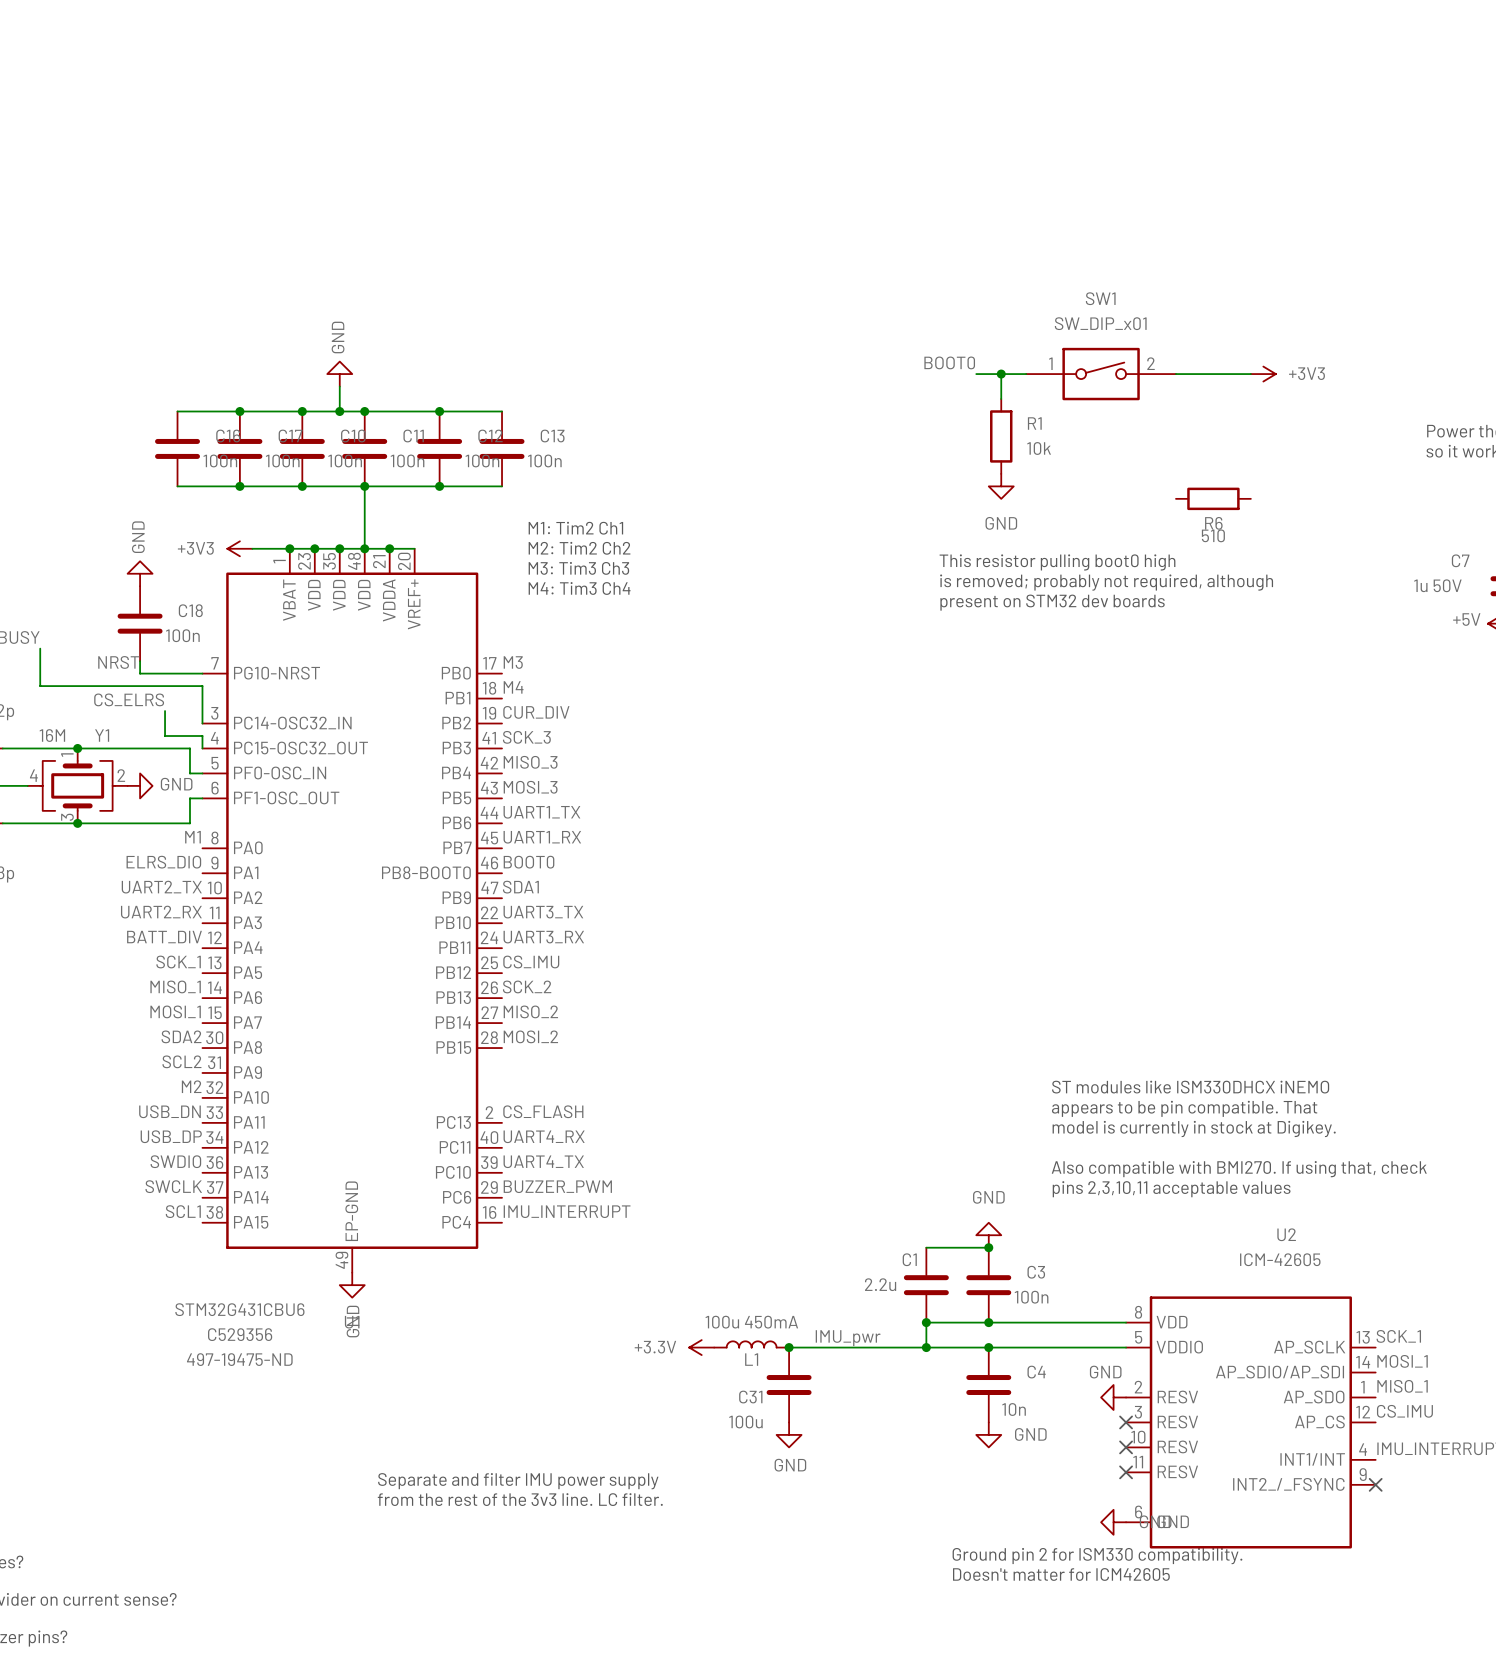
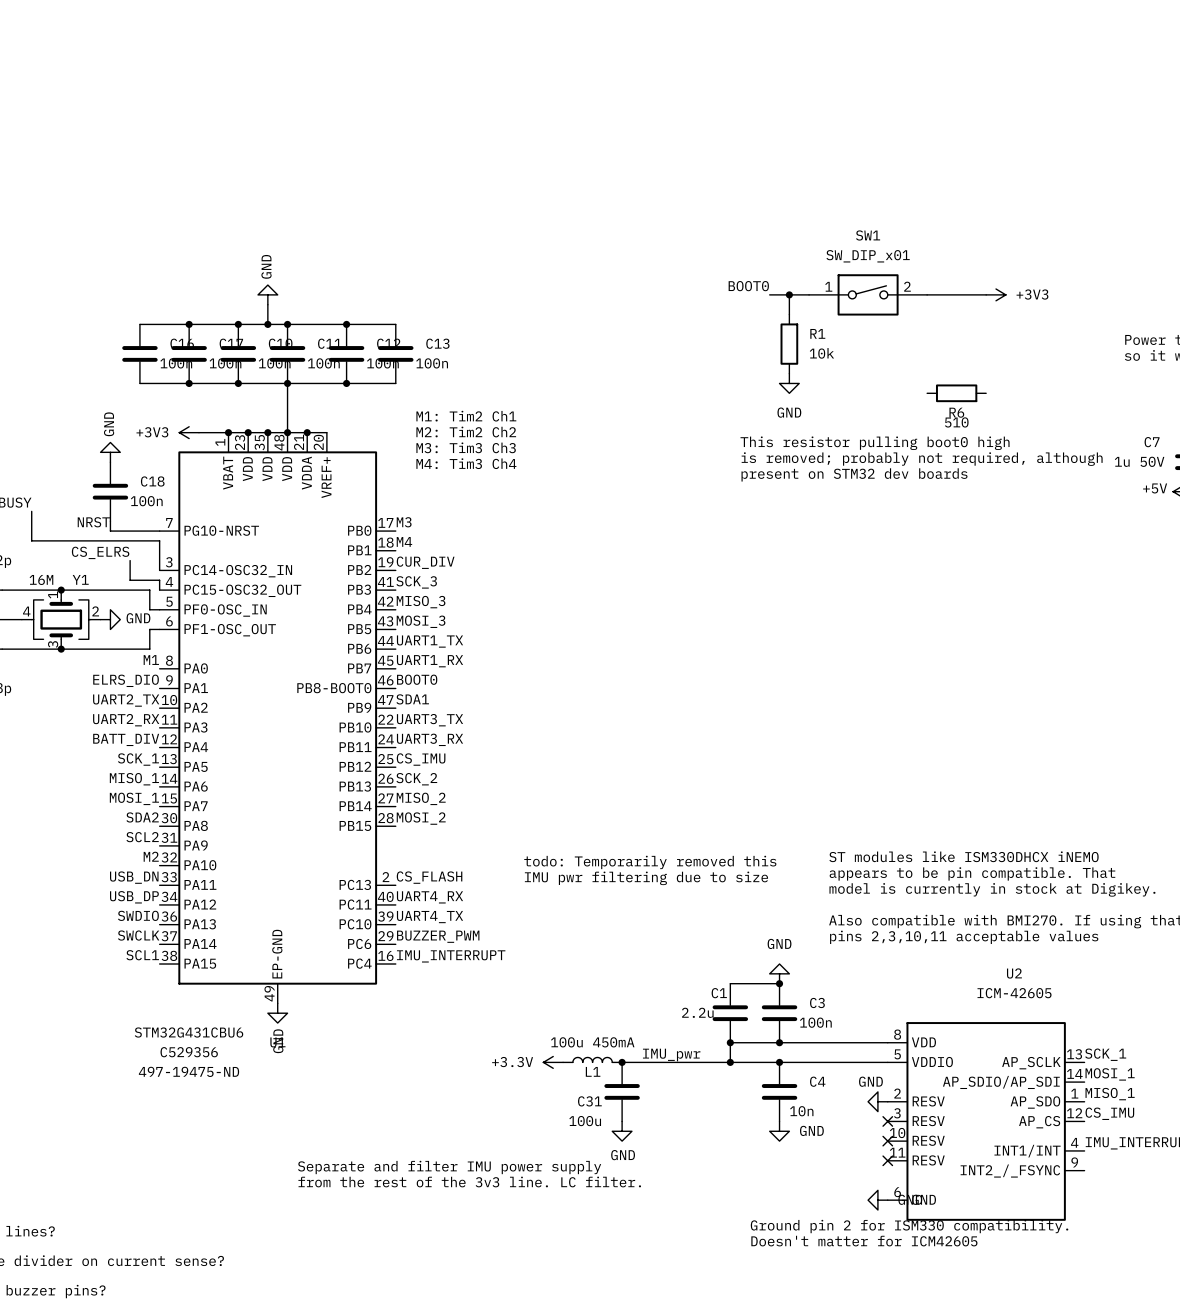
text: none -> todo: Temporarily removed this (650, 862)
text: none -> IMU pwr filtering due to size (646, 878)
no-connect mark: (1375, 1484) -> none

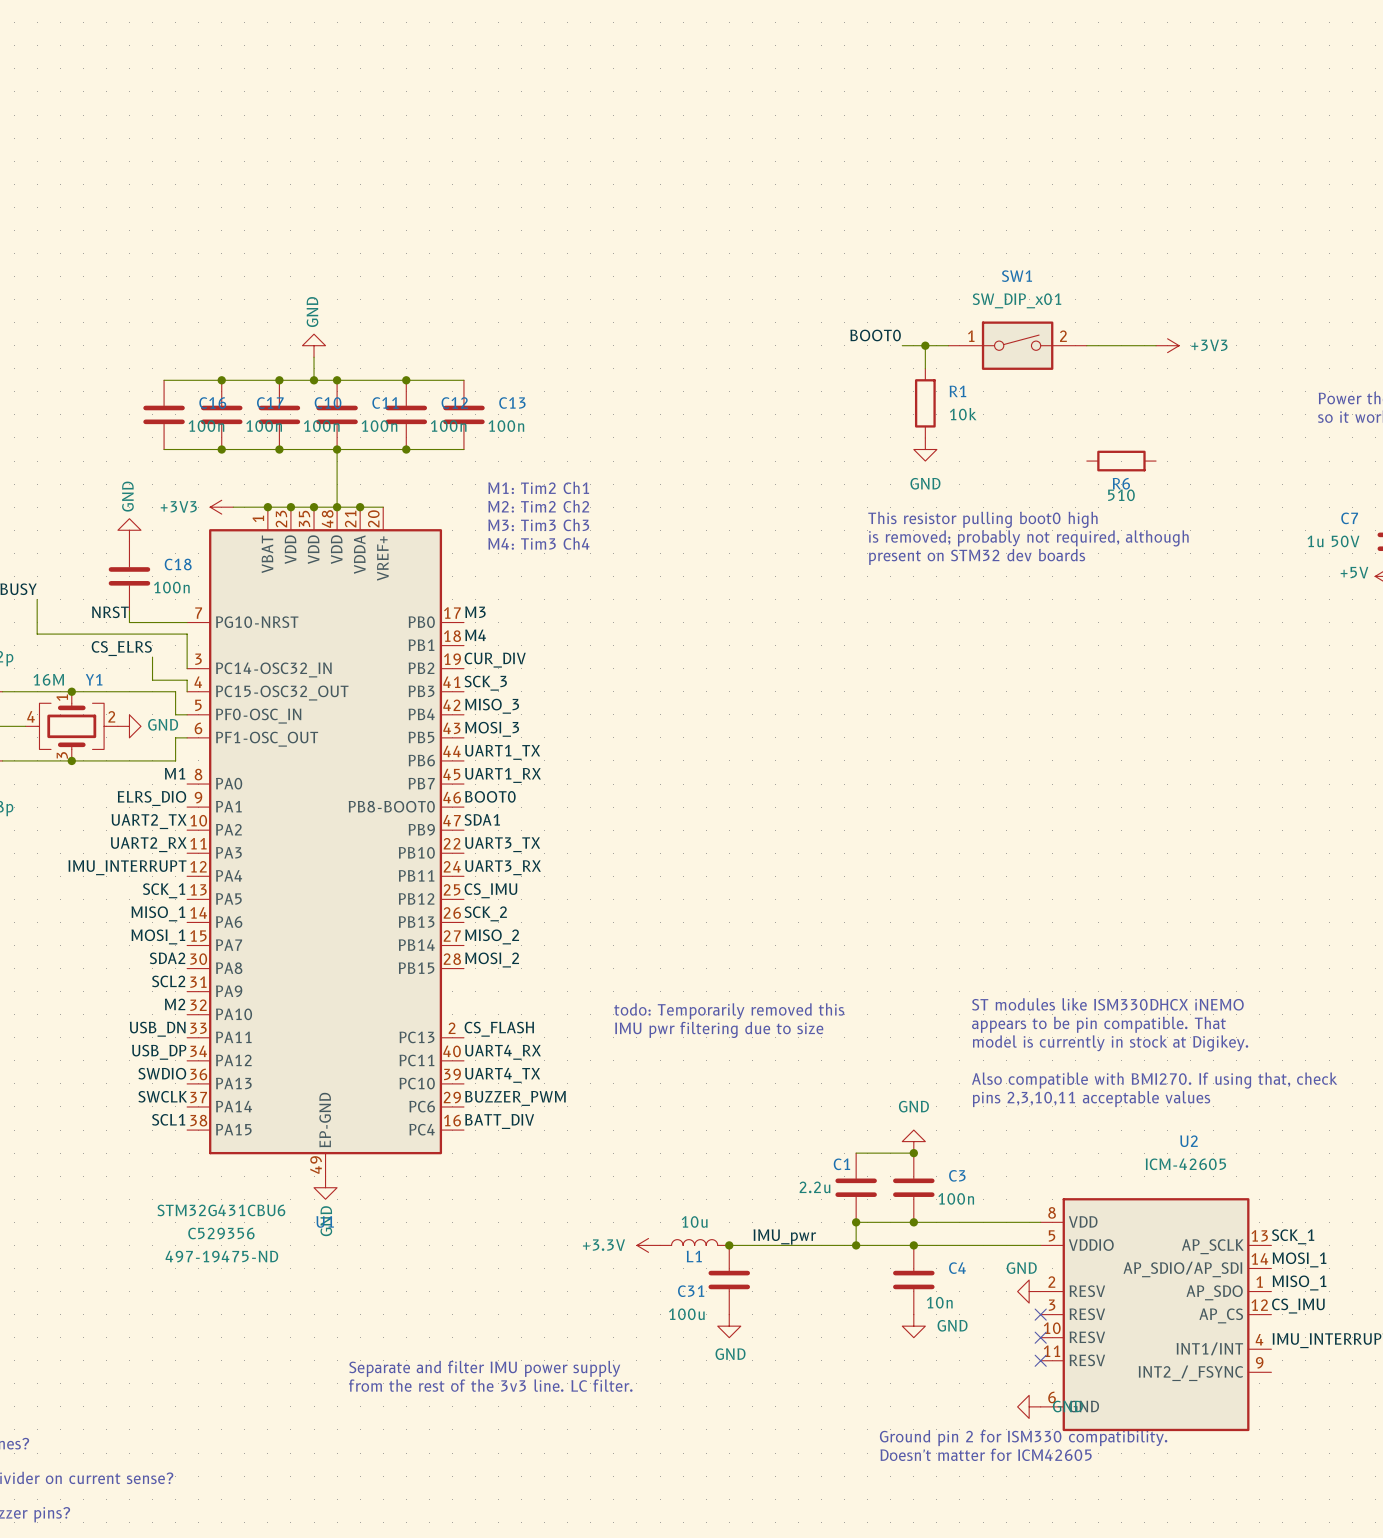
label: BATT_DIV (126, 739) -> IMU_INTERRUPT (127, 867)
label: IMU_INTERRUPT (451, 956) -> BATT_DIV (499, 1121)
L1 value: 100u 450mA (592, 1042) -> 10u (694, 1221)

